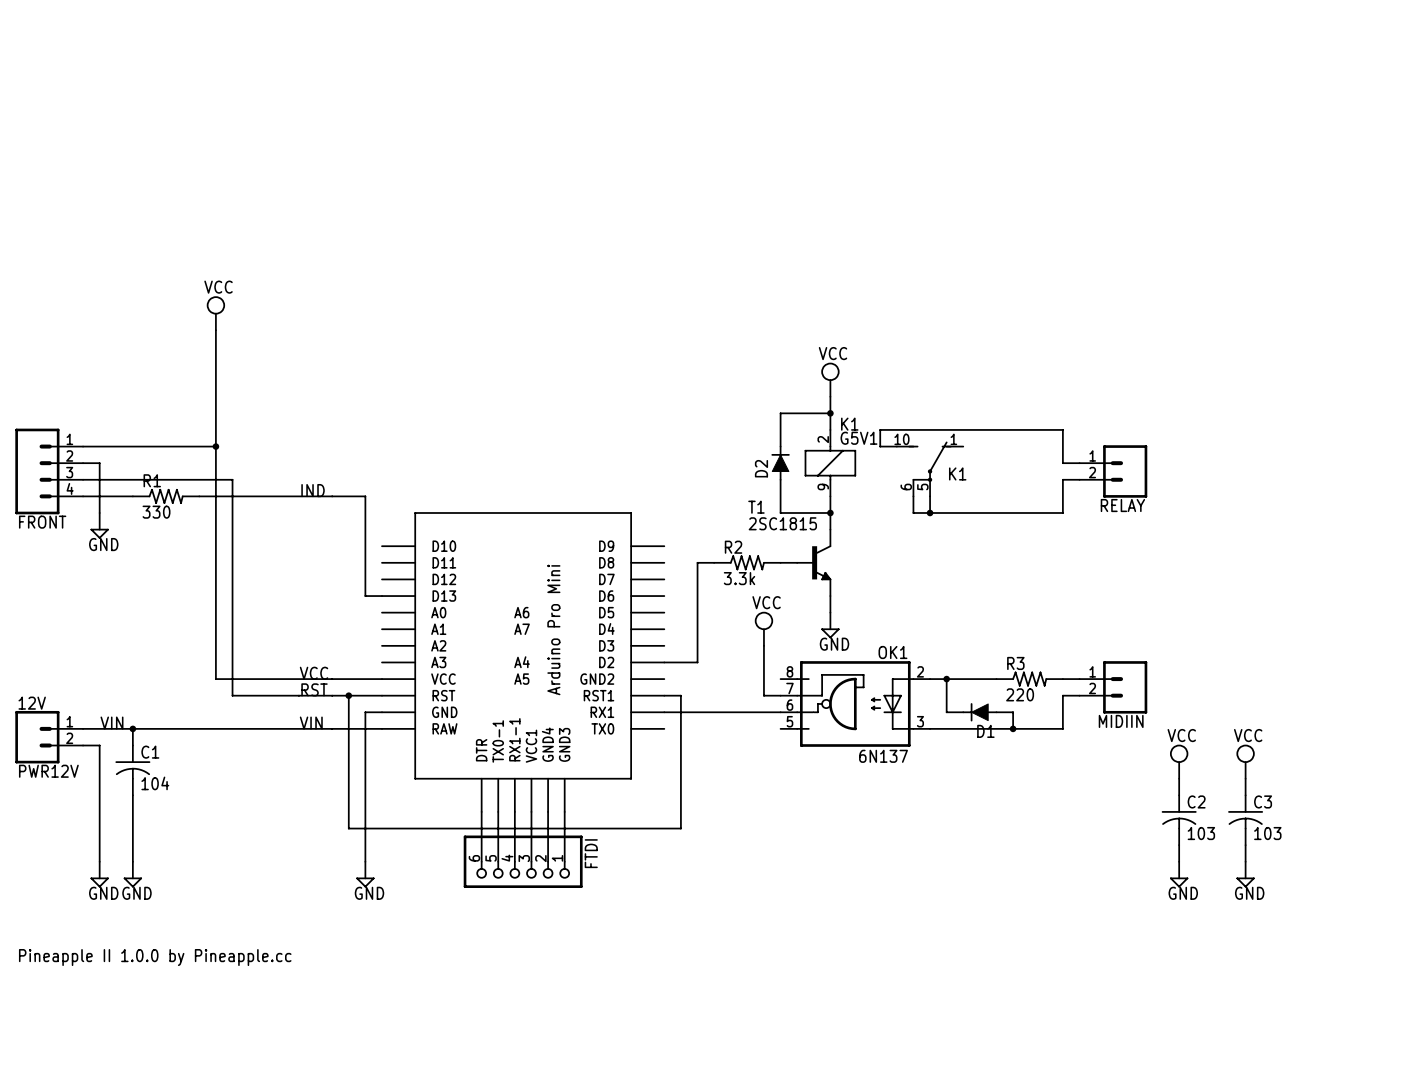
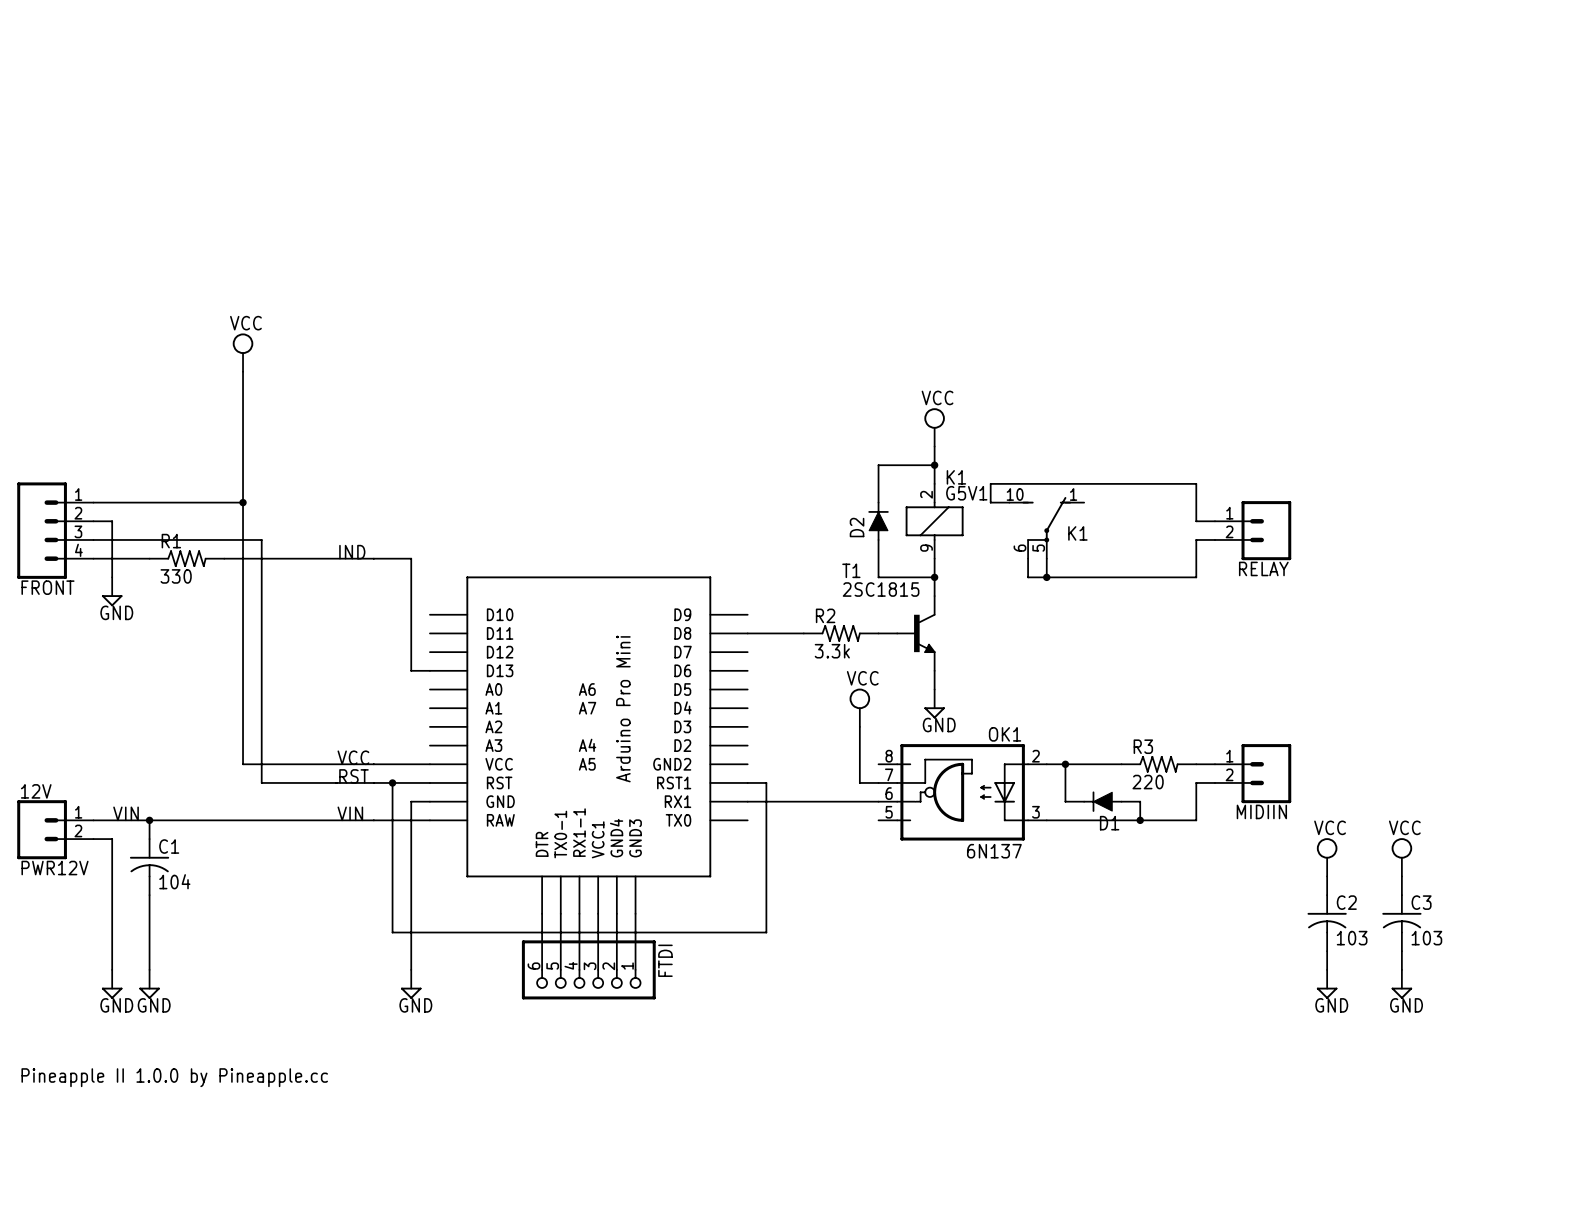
wire: (697, 562) (697, 662) (664, 662) -> (785, 633) (747, 633)

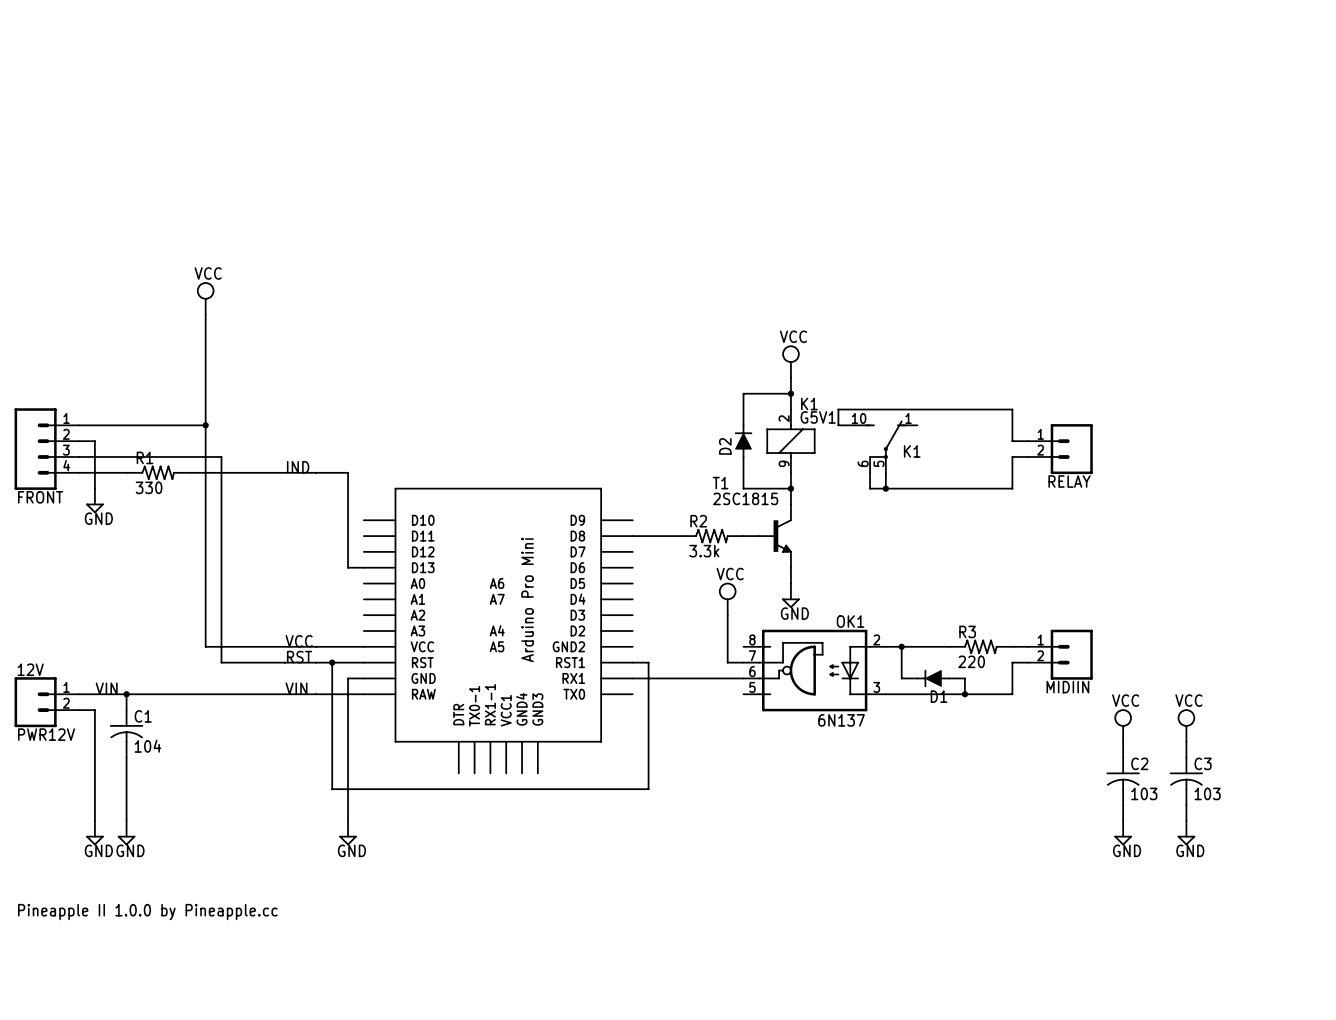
wire: (542, 913) (542, 969) -> none
wire: (560, 913) (560, 969) -> none
wire: (579, 913) (579, 969) -> none
wire: (598, 913) (598, 969) -> none
wire: (616, 913) (616, 969) -> none
wire: (635, 913) (635, 969) -> none
FTDI: (588, 969) -> none

